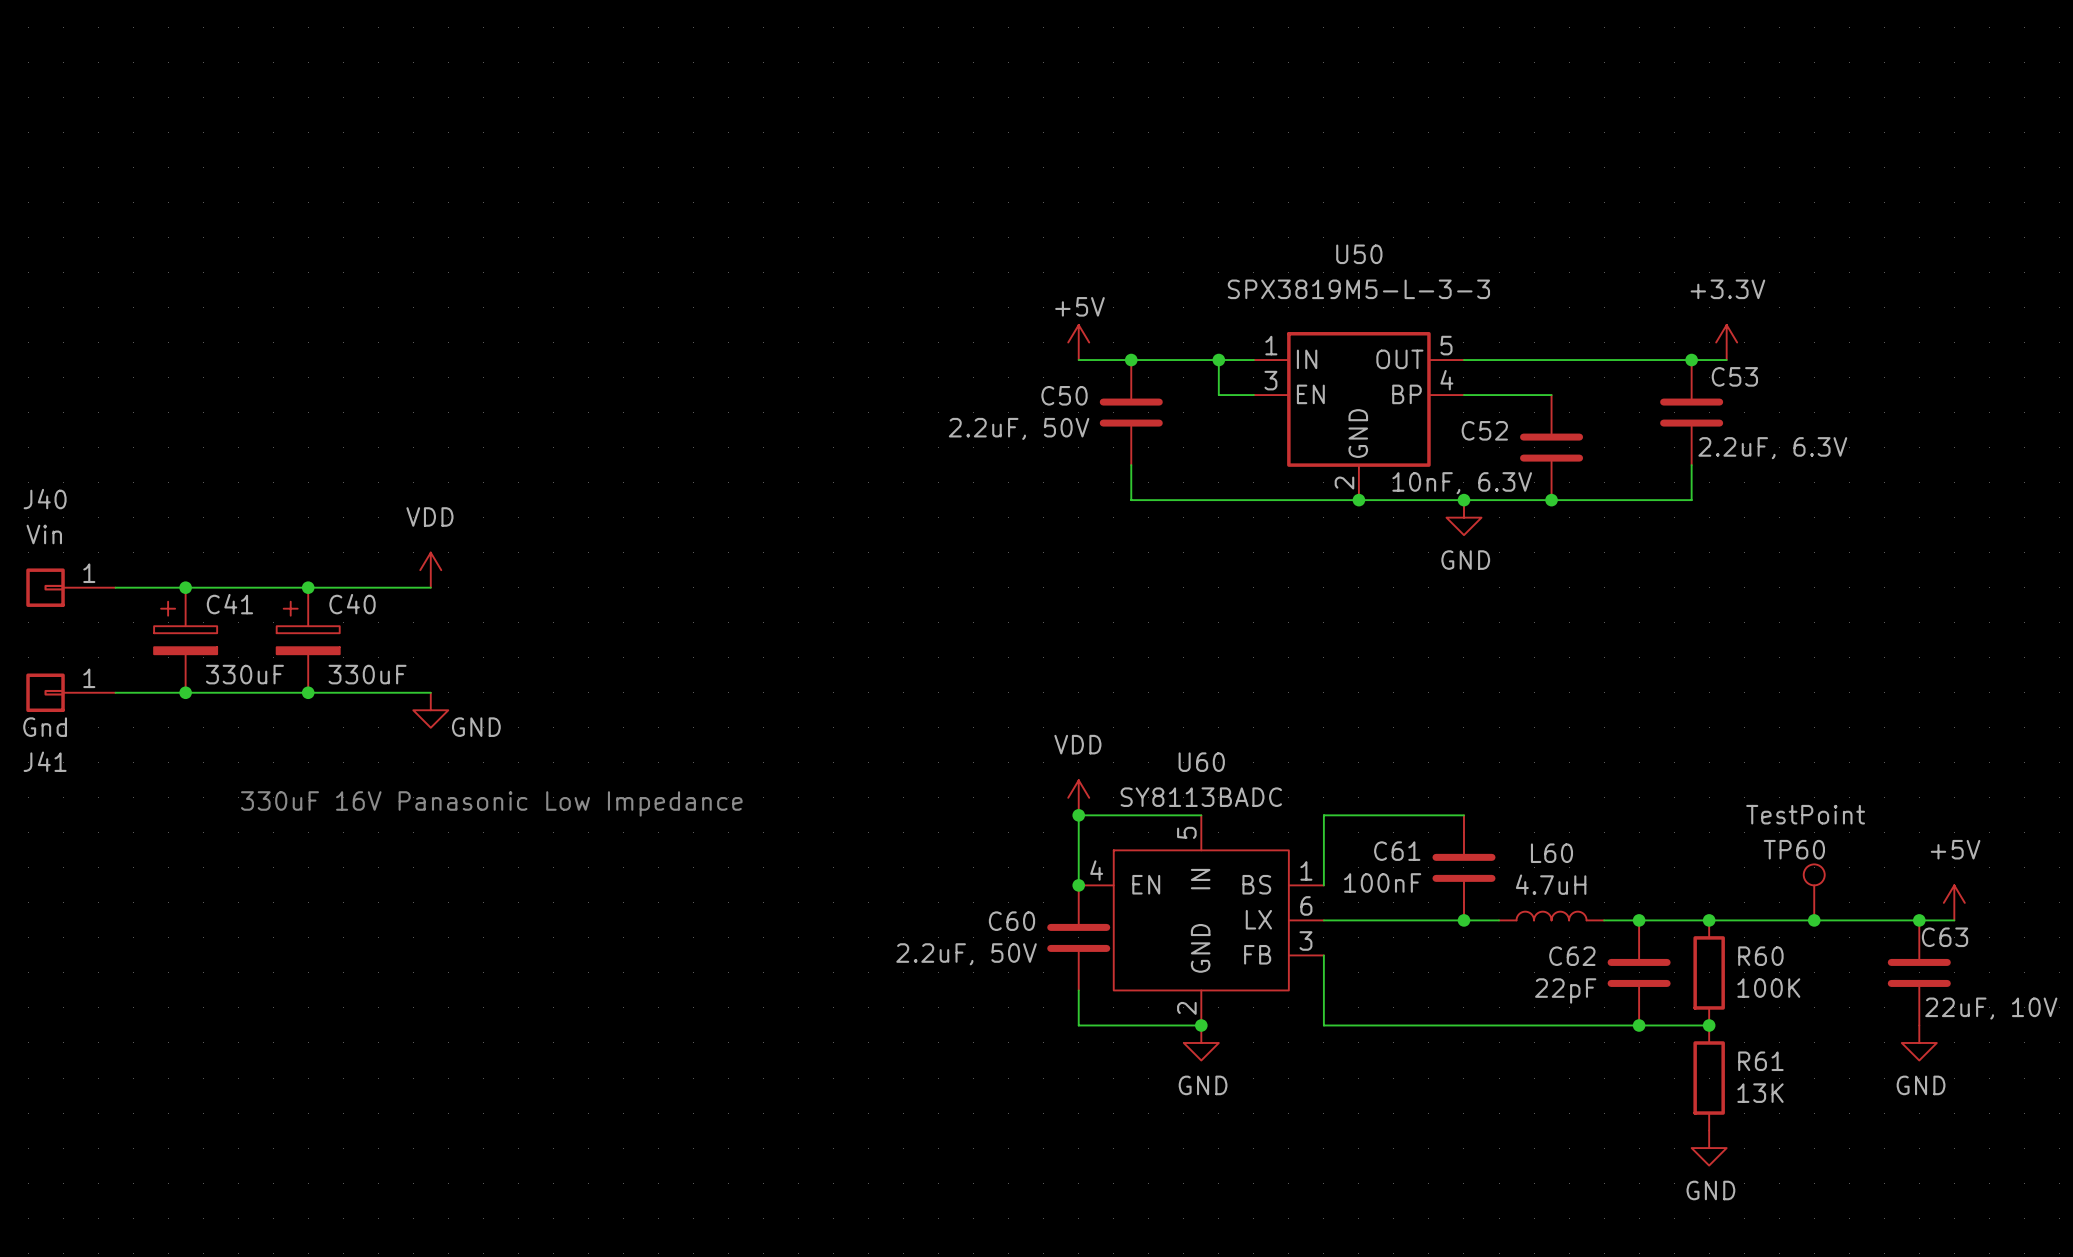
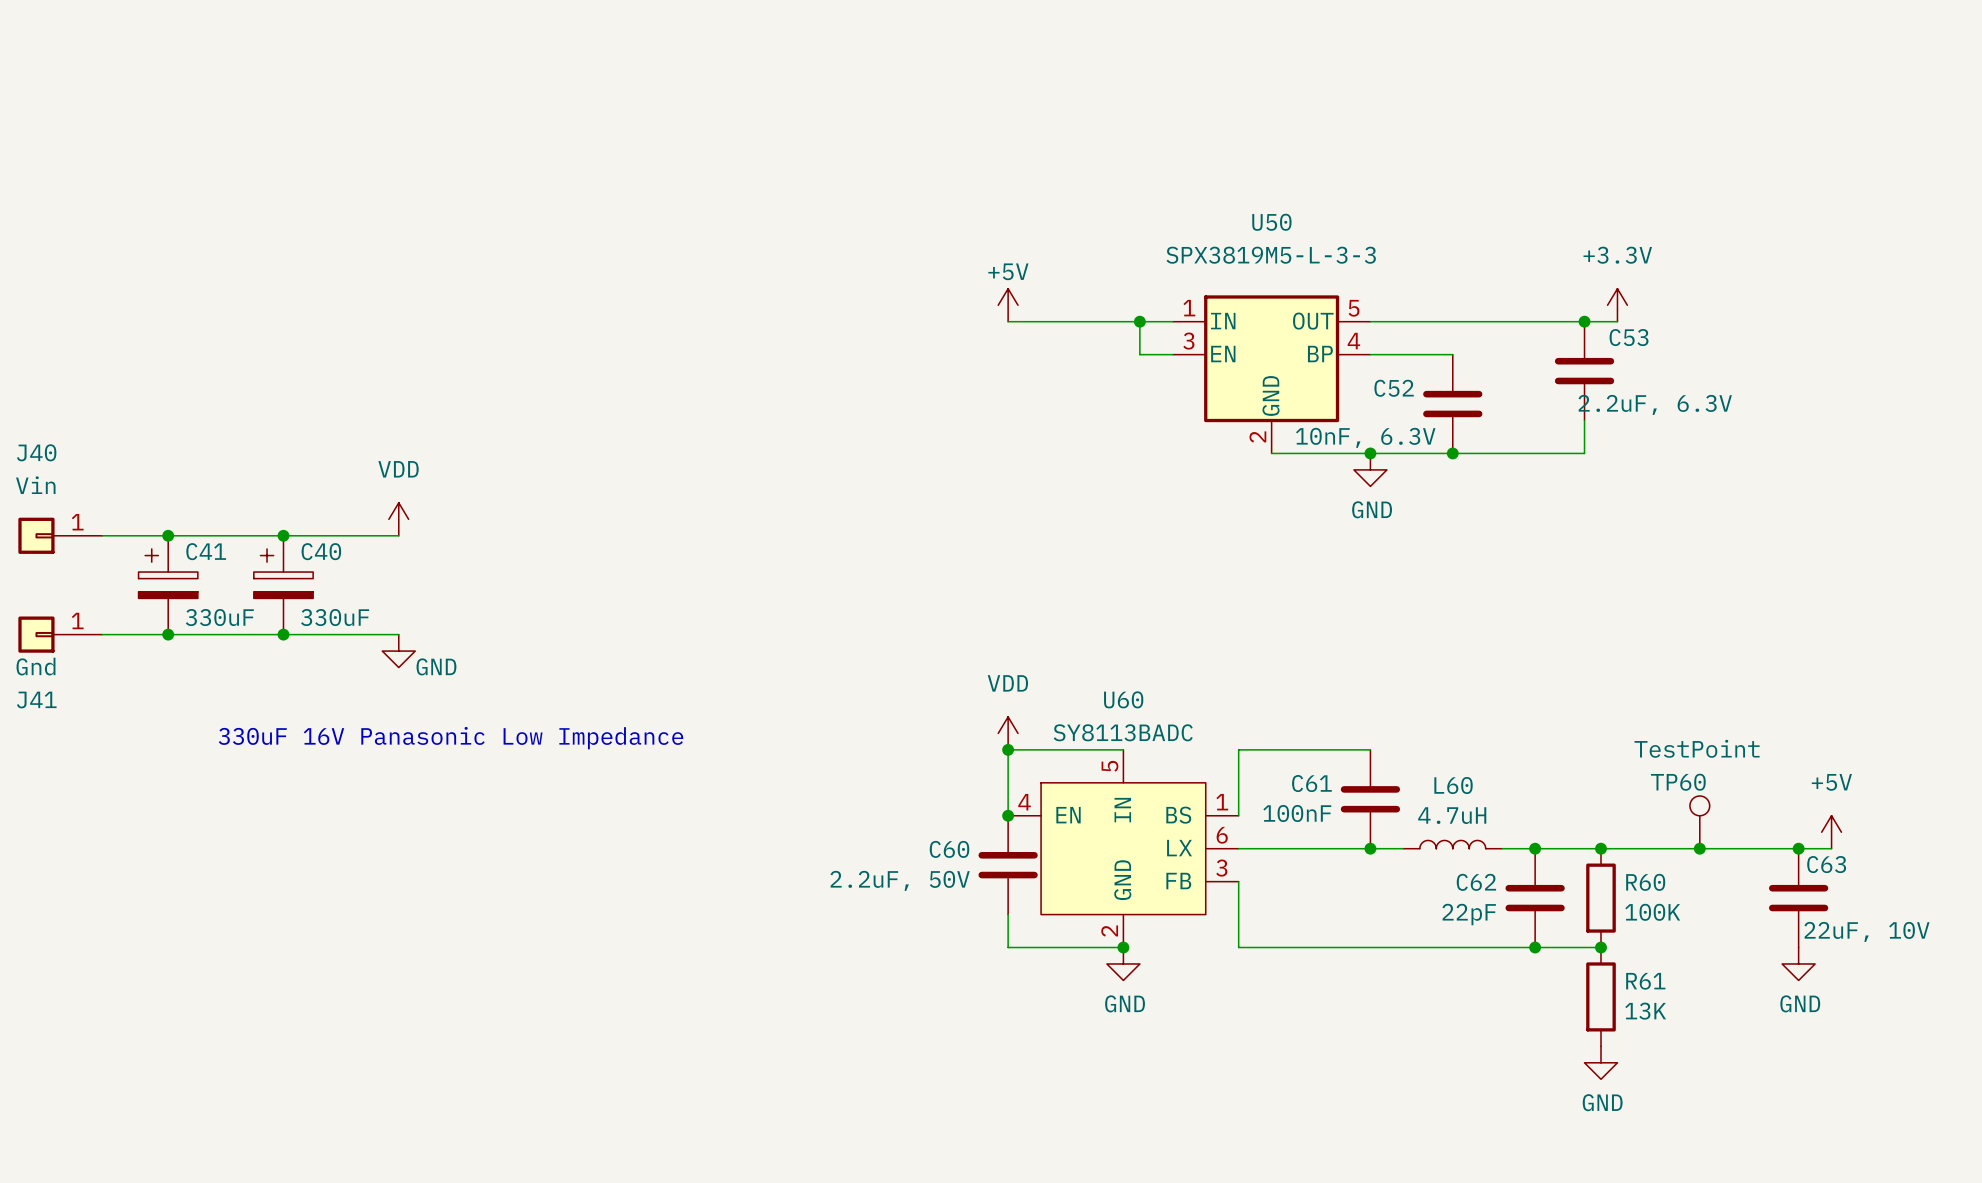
junction: (1131, 360) -> none
C50: 2.2uF, 50V (1131, 412) -> none
wire: (1131, 465) (1131, 500) (1358, 500) -> none
junction: (1358, 500) -> none

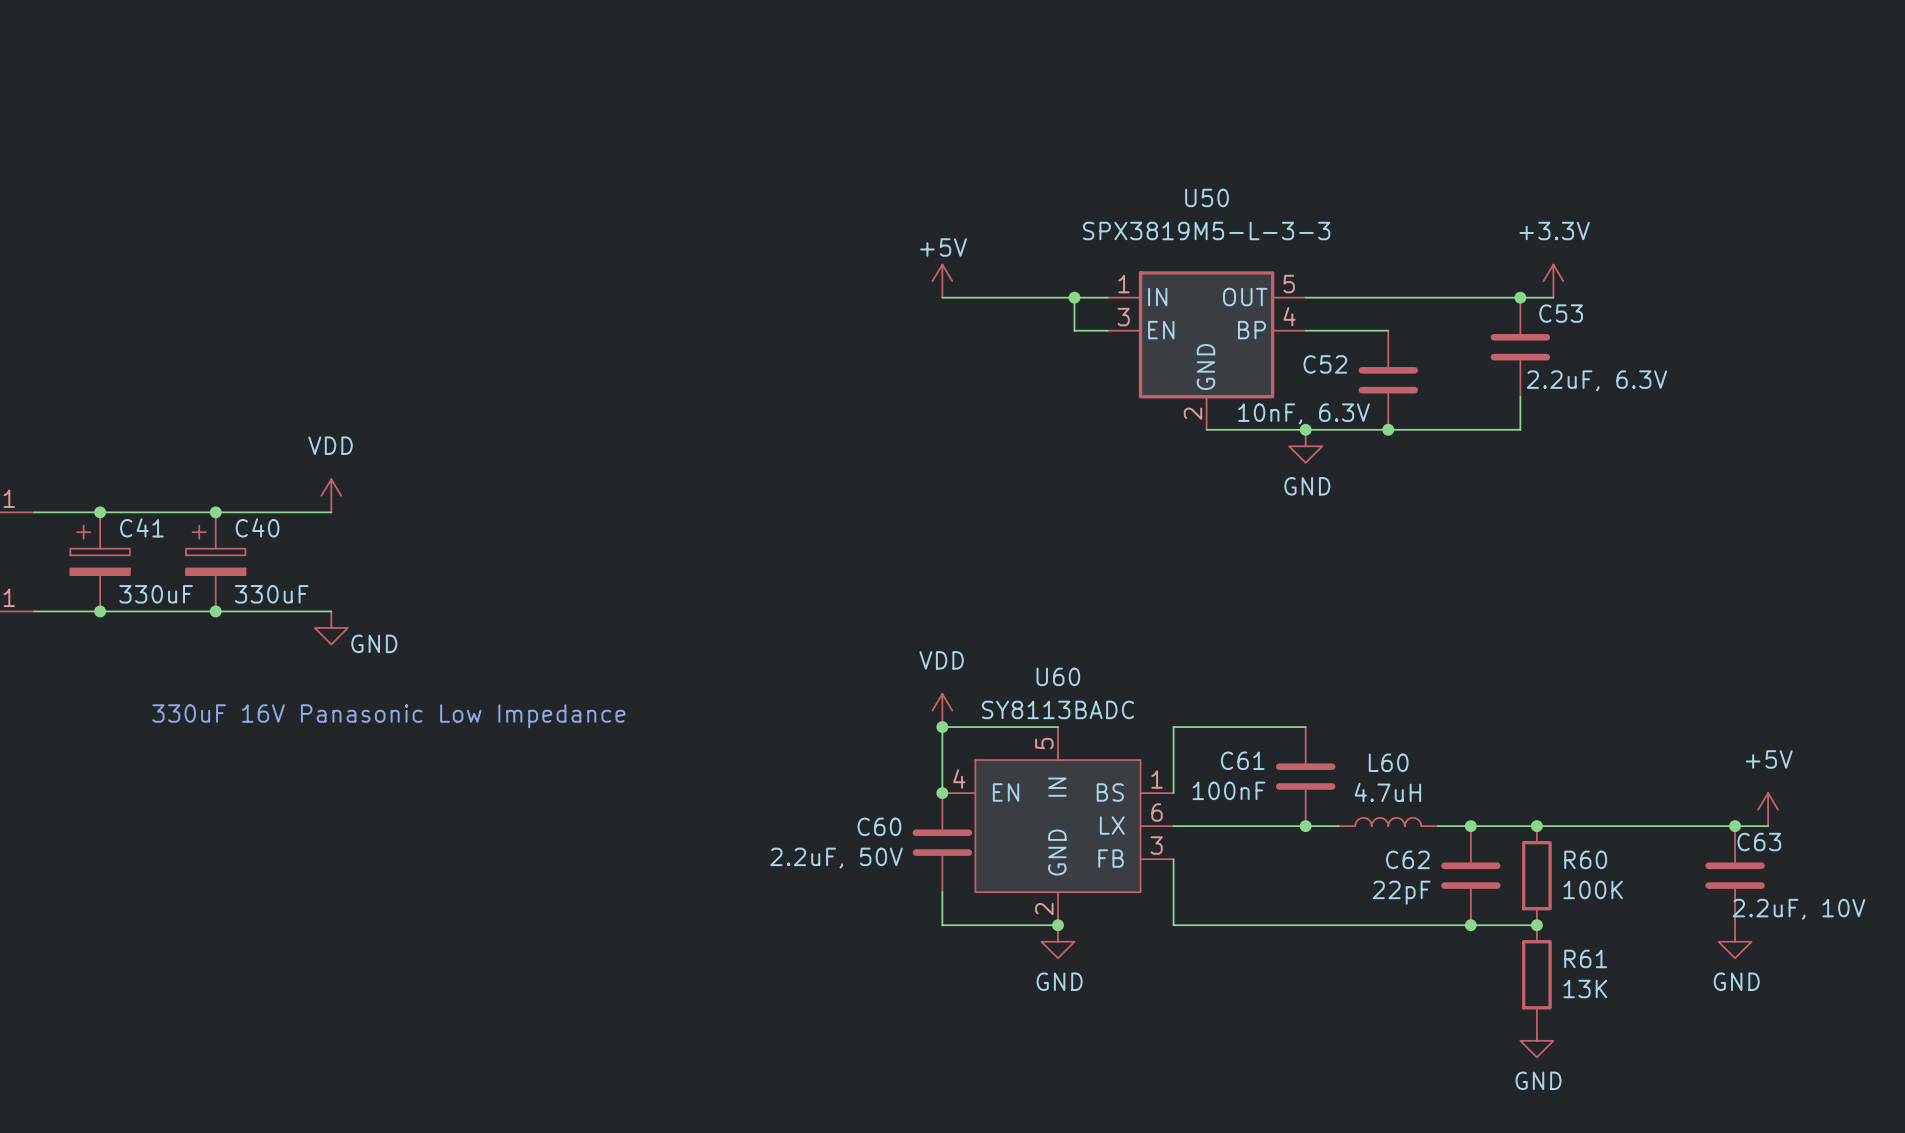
TP60: TestPoint (1699, 822) -> none
junction: (1699, 848) -> none
C63 value: 22uF, 10V (1867, 931) -> 2.2uF, 10V (1799, 909)

